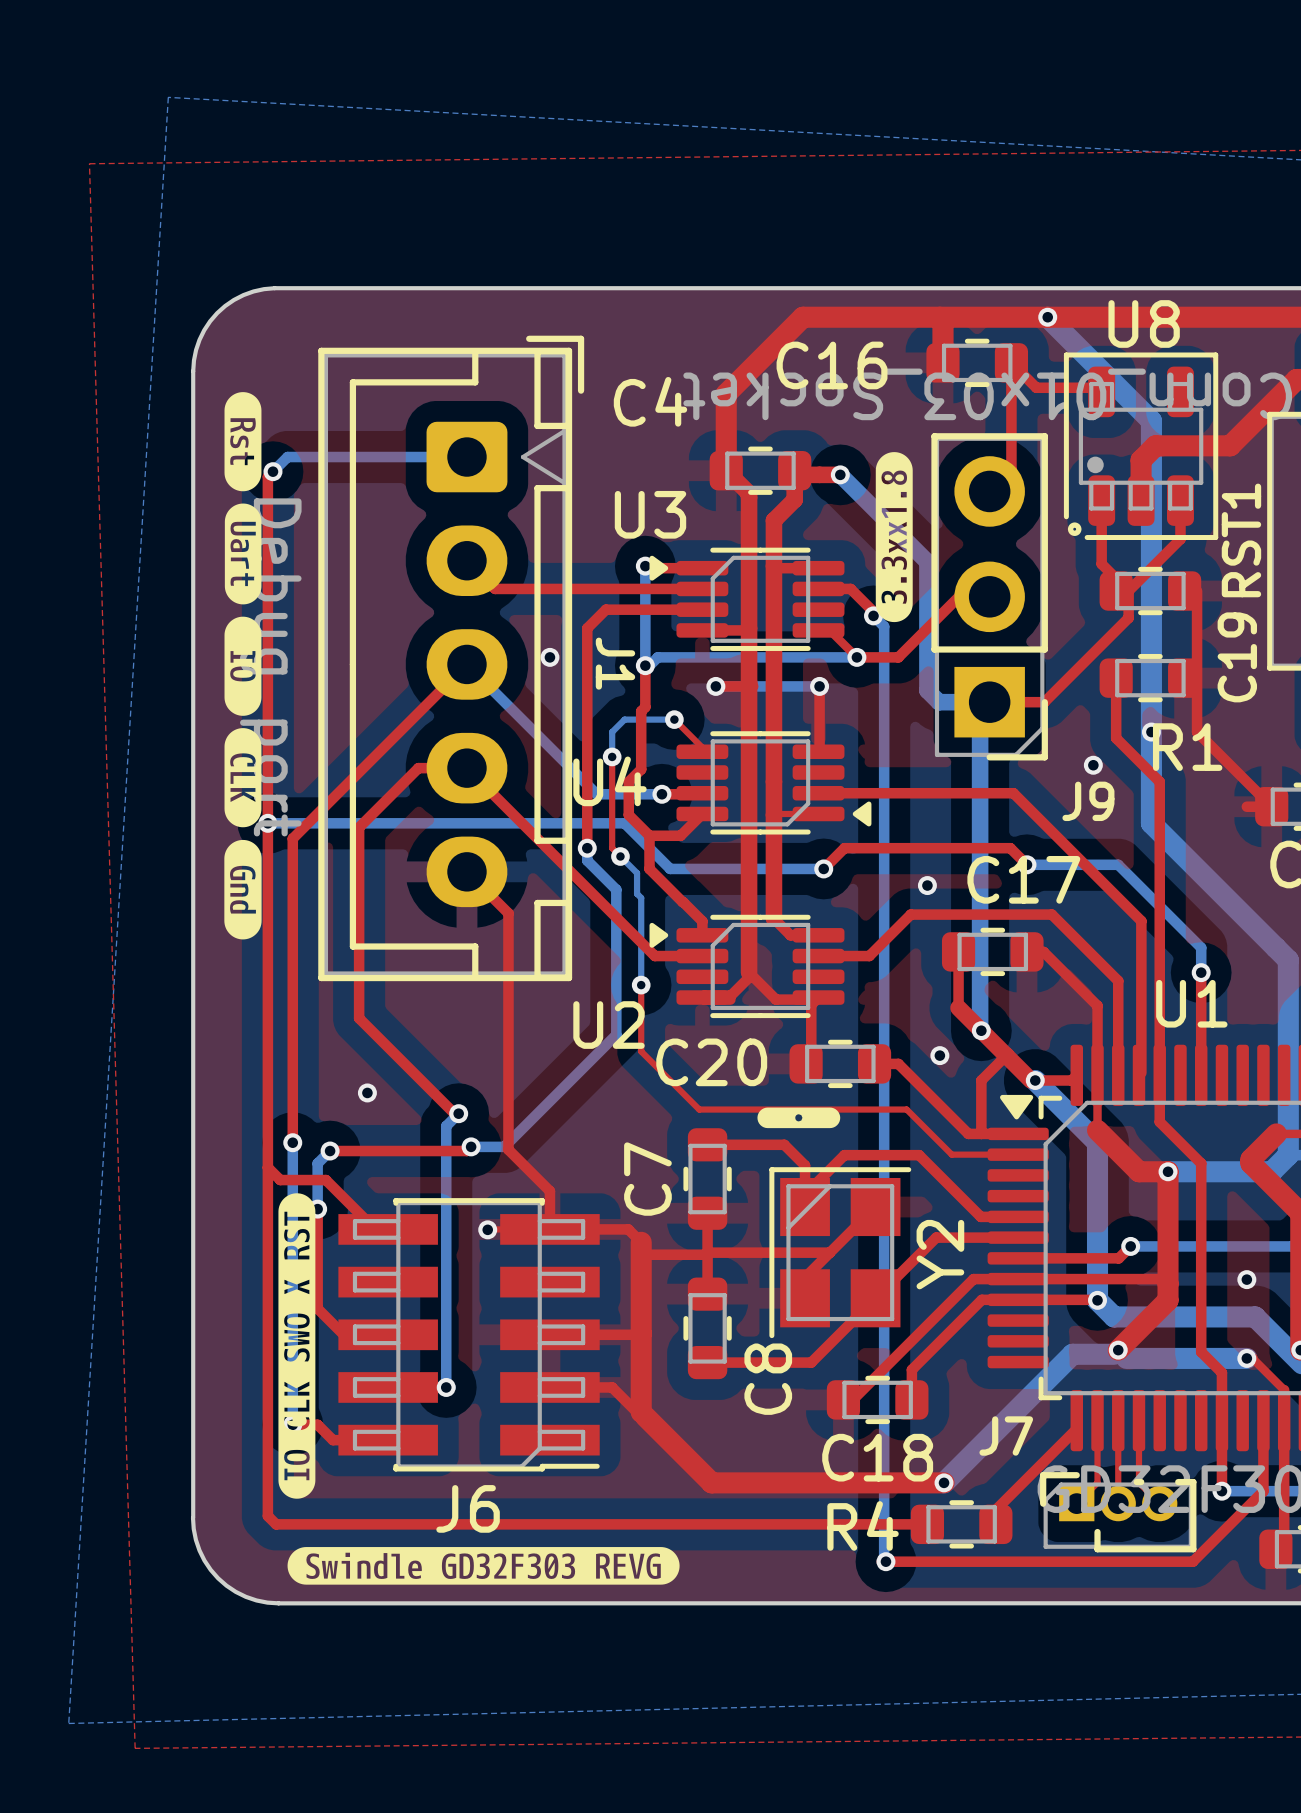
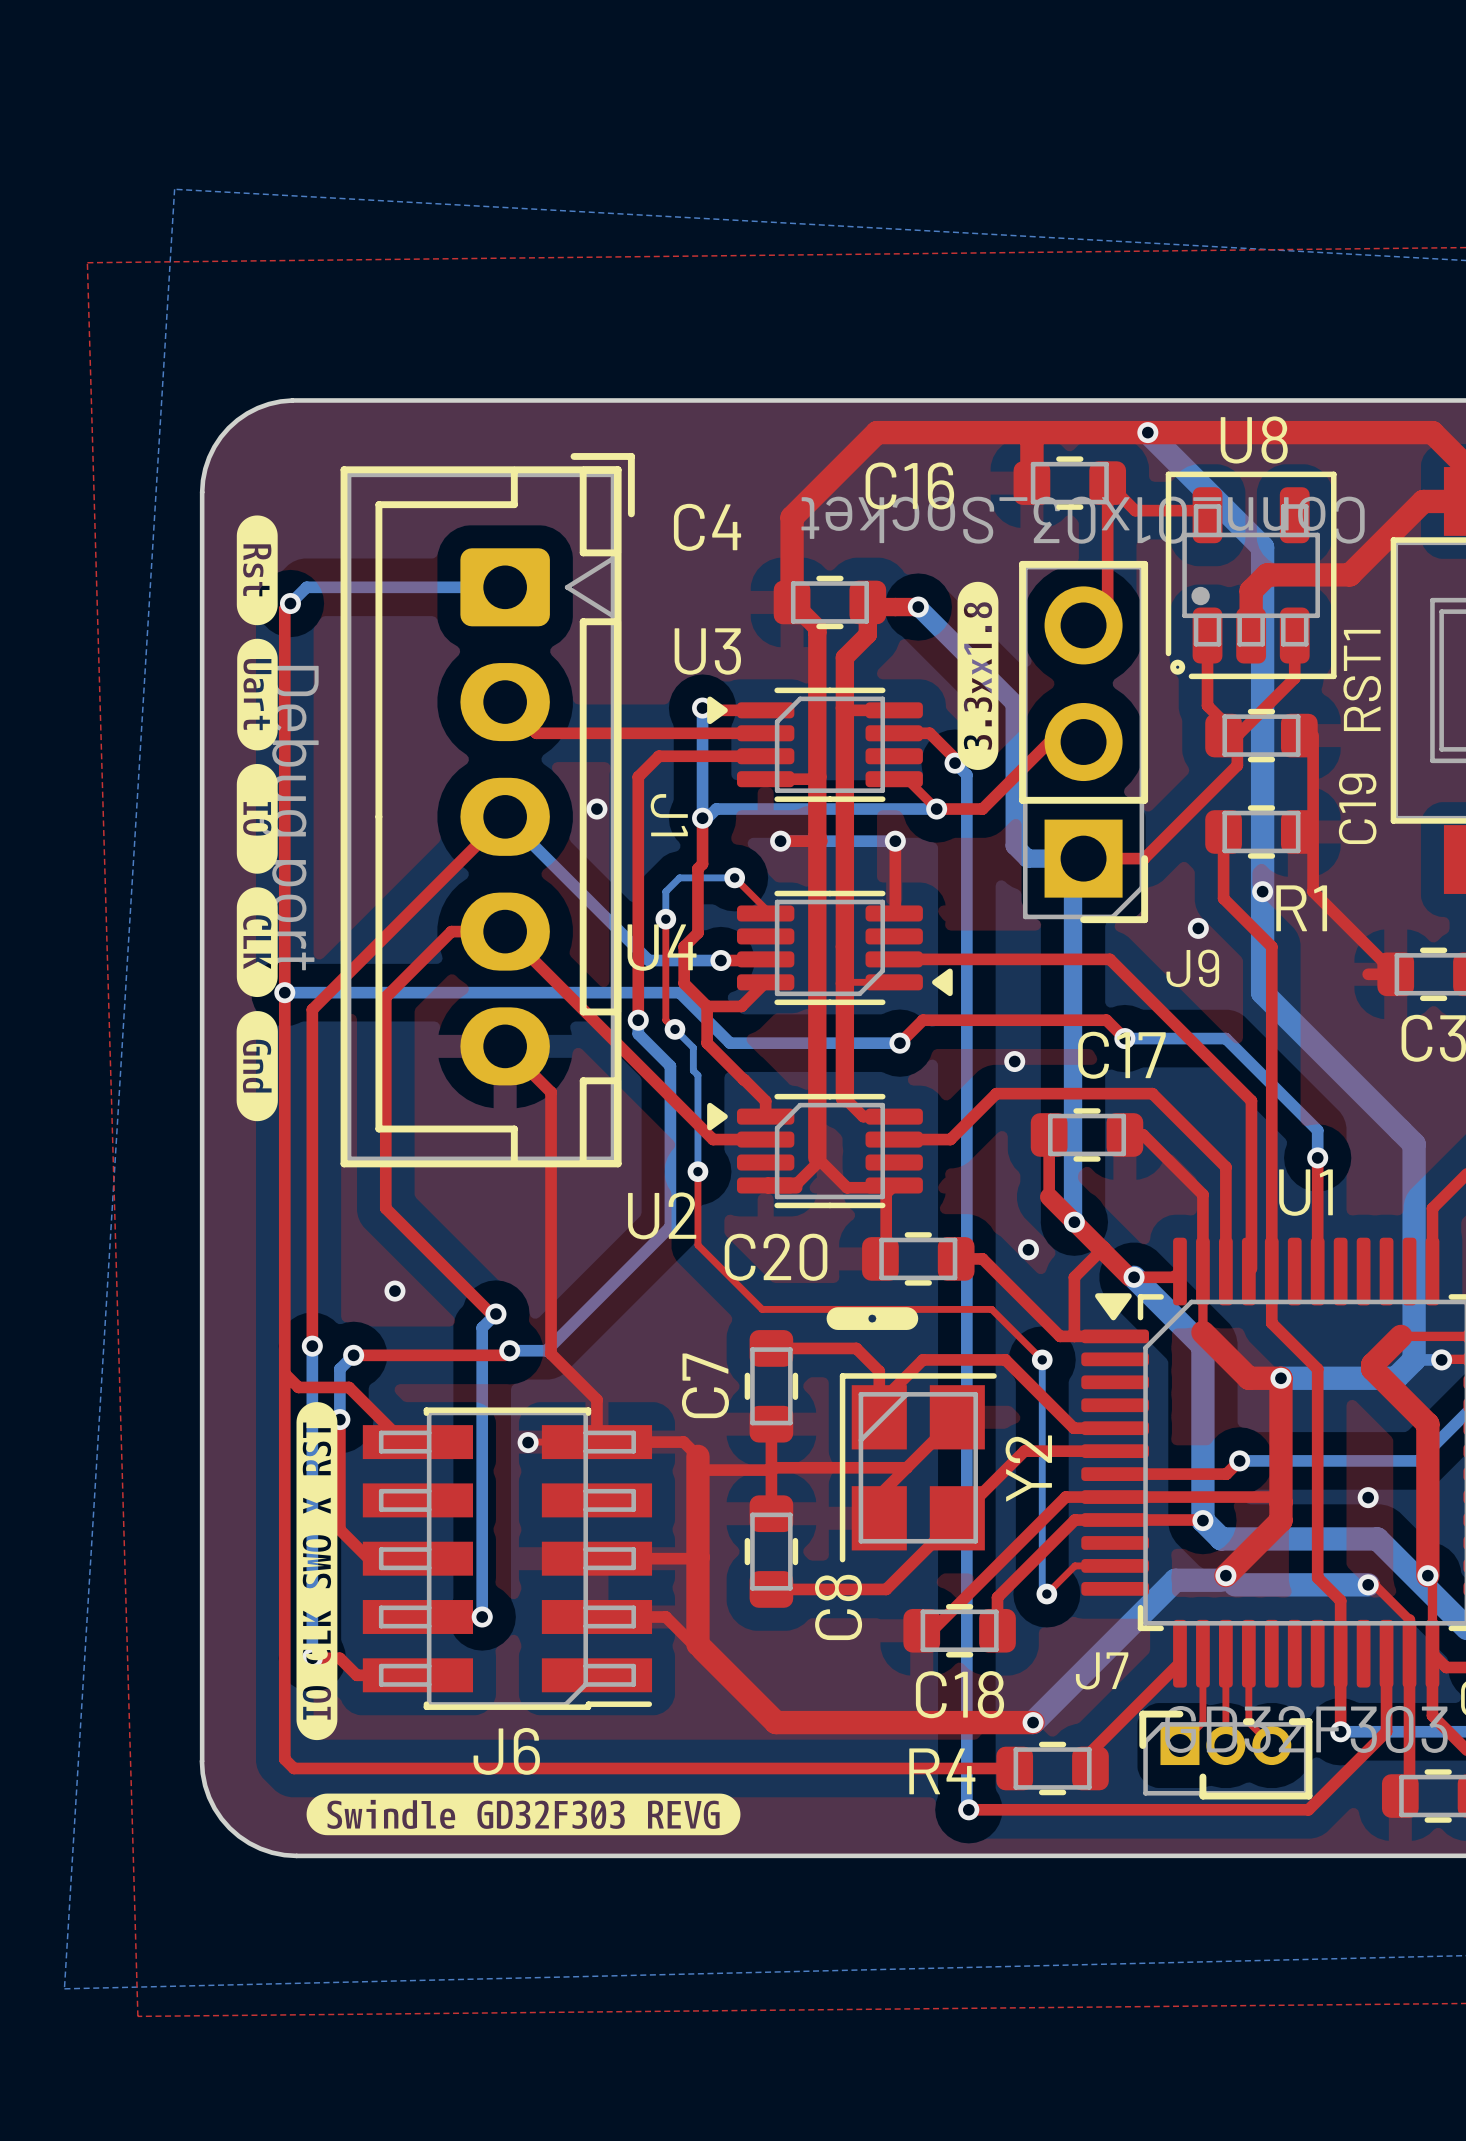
top track: (951, 1154) (1018, 1154) -> none
bottom track: none -> (1042, 1359) (1042, 1589) (1046, 1594)
via: none -> (1042, 1359)
top track: none -> (1115, 1565) (1074, 1565) (1046, 1594)
via: none -> (1046, 1594)

